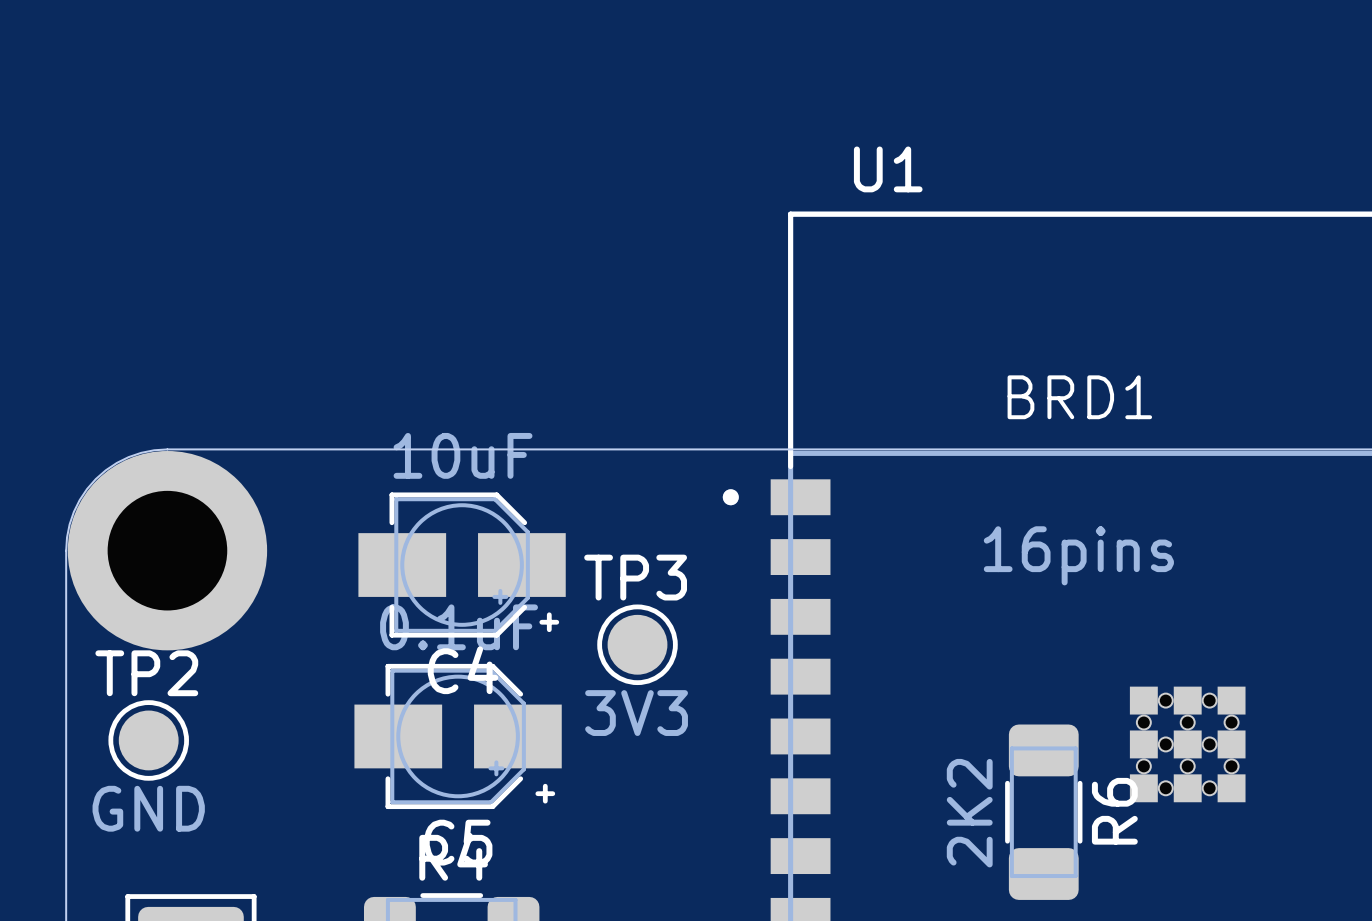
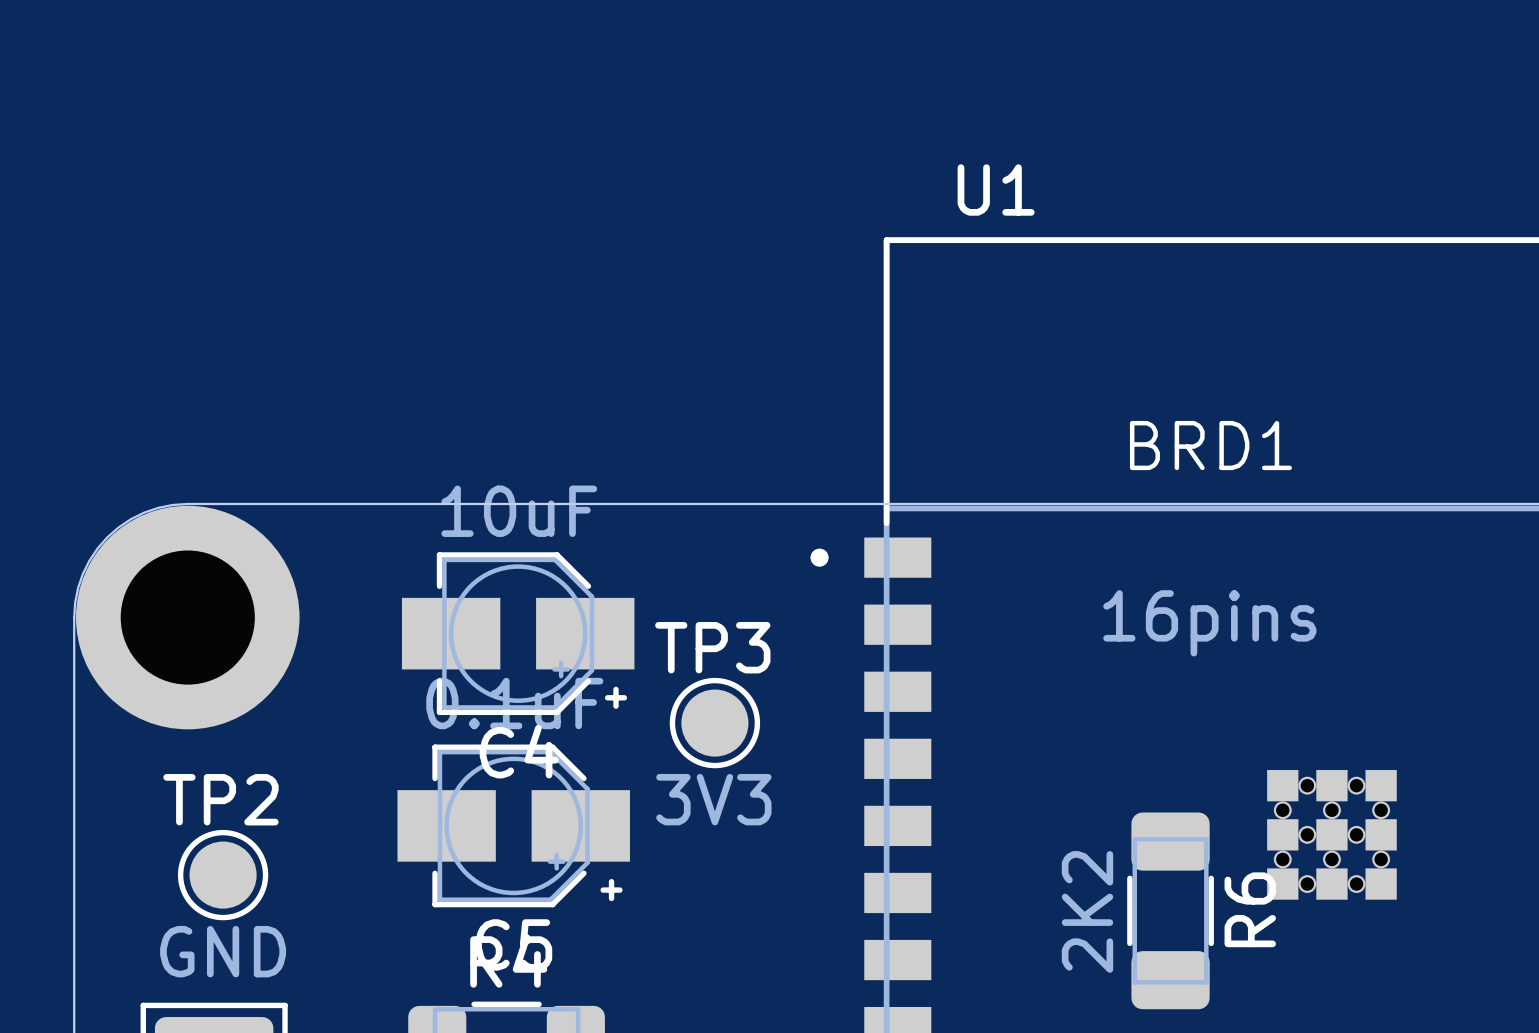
TP2 position: (148, 740) -> (223, 875)

